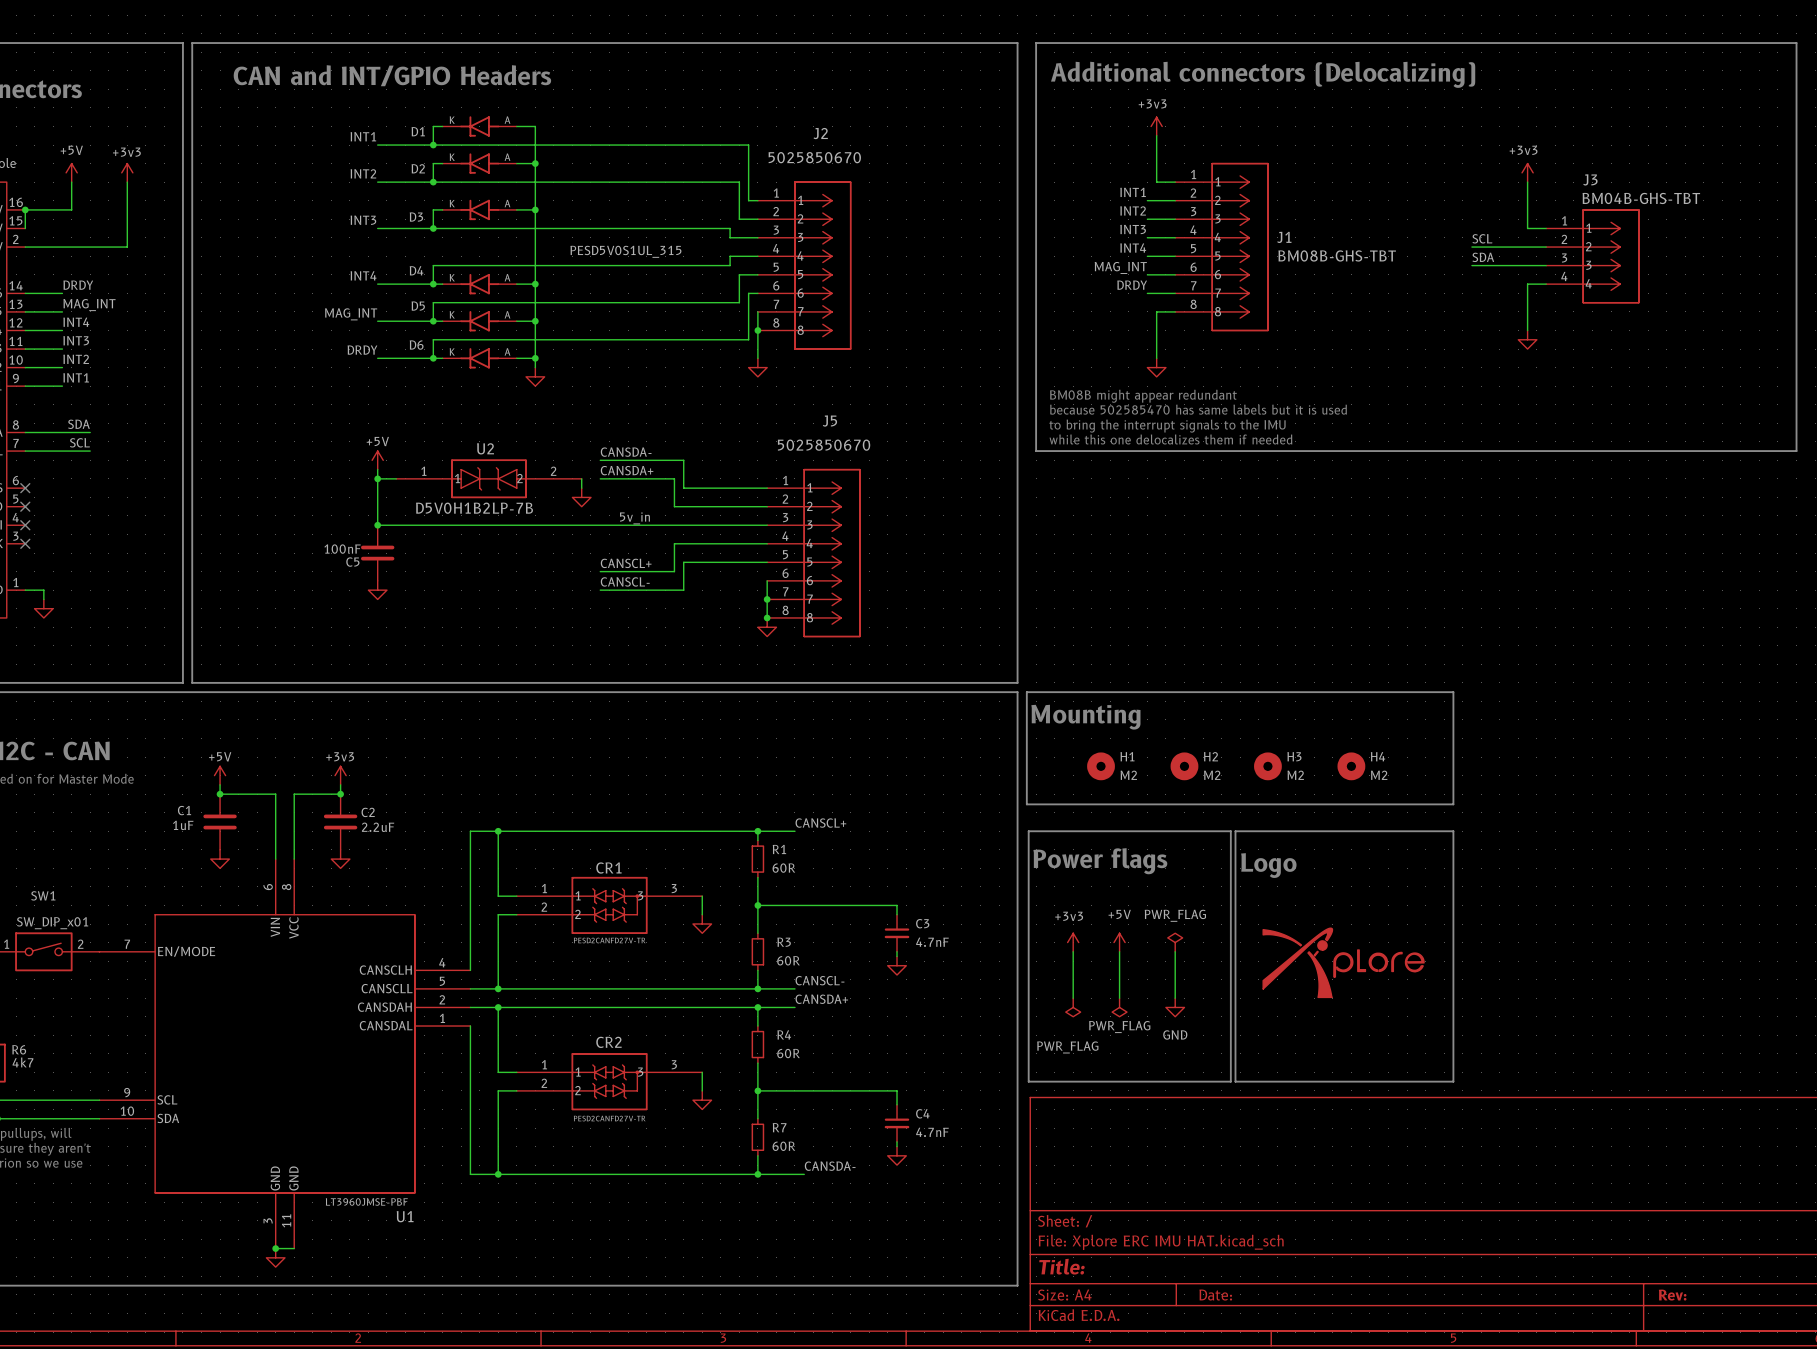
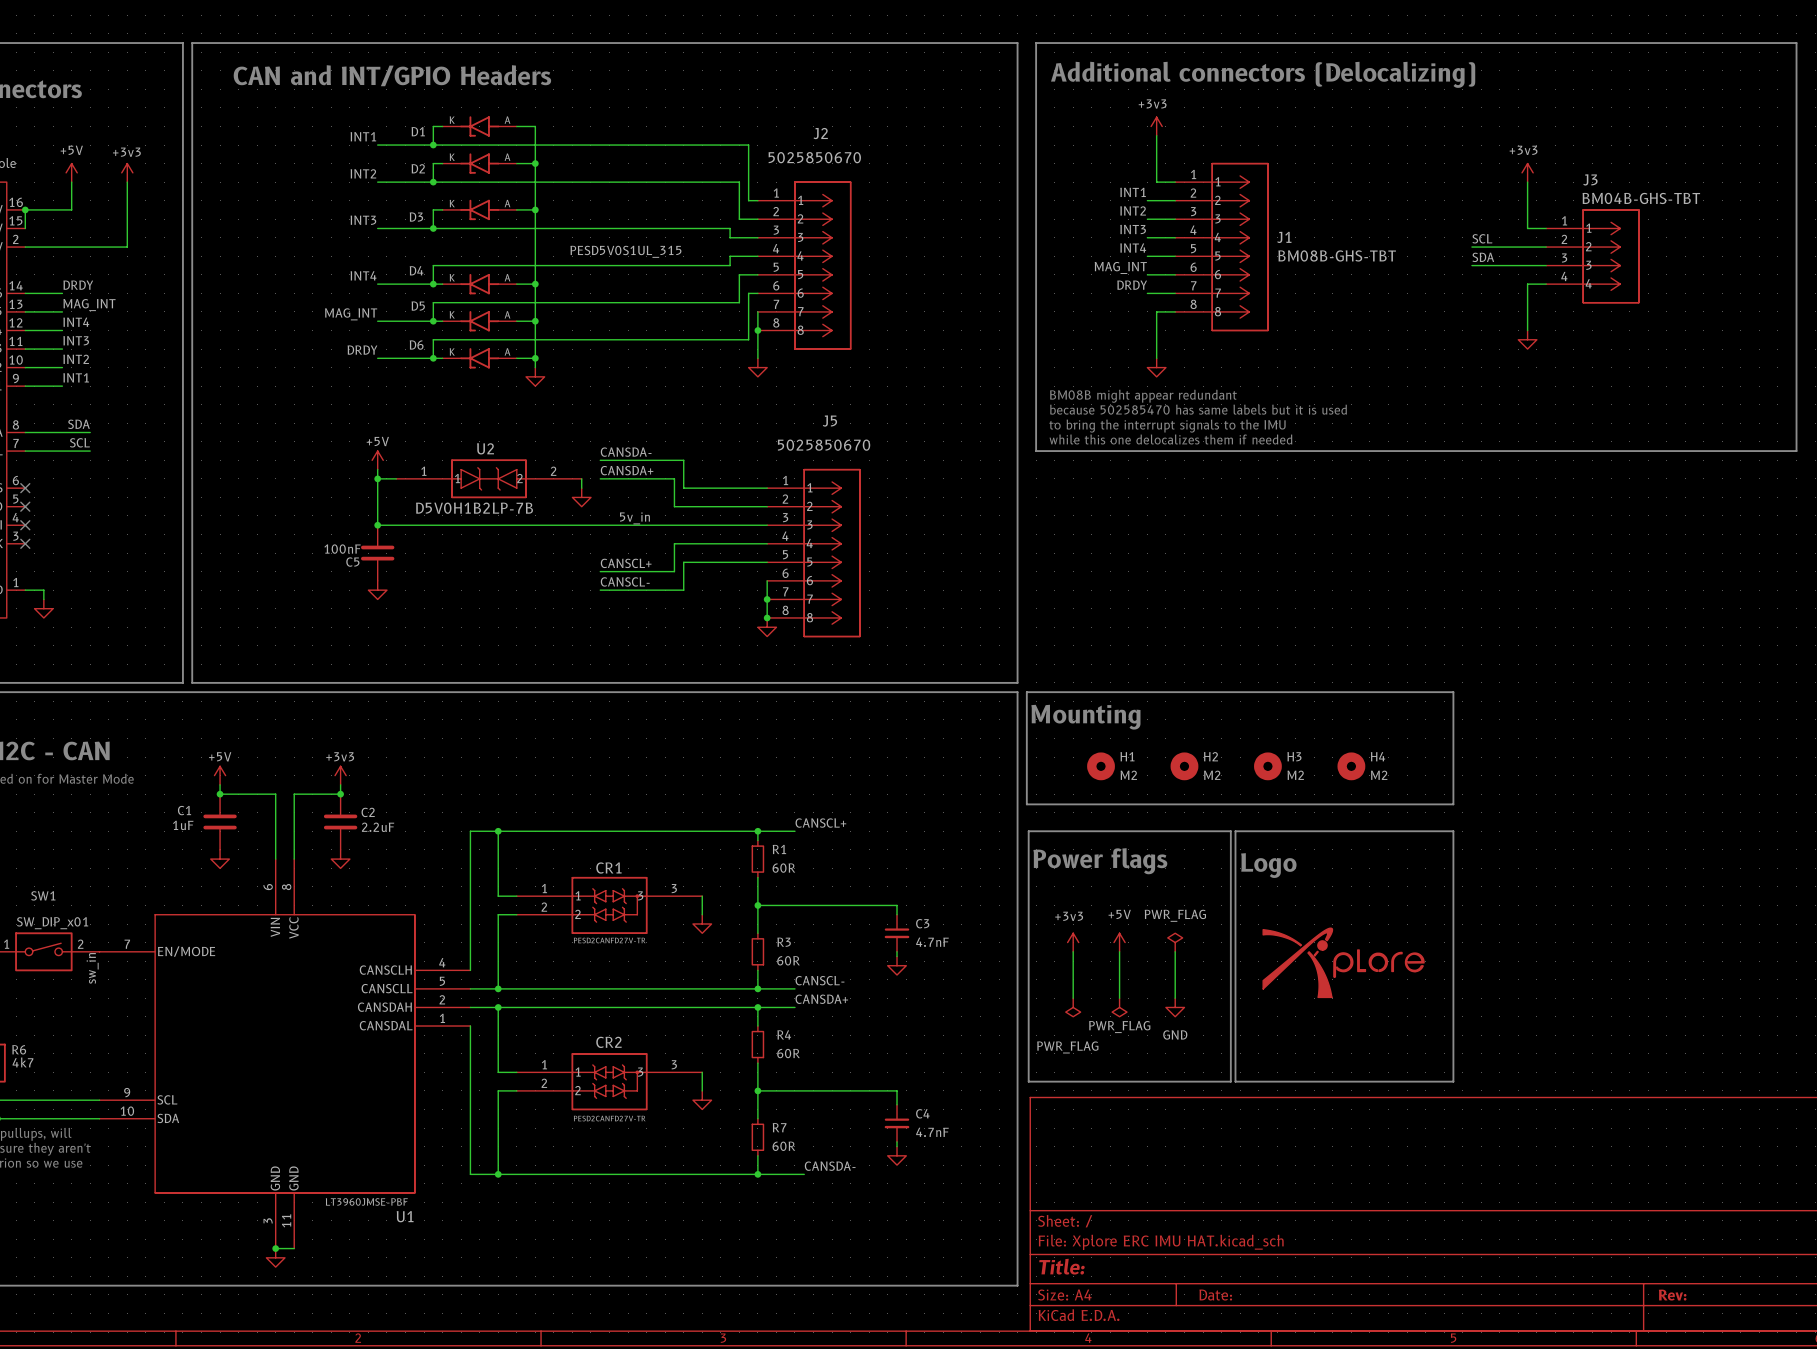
label: none -> sw_in (92, 968)

